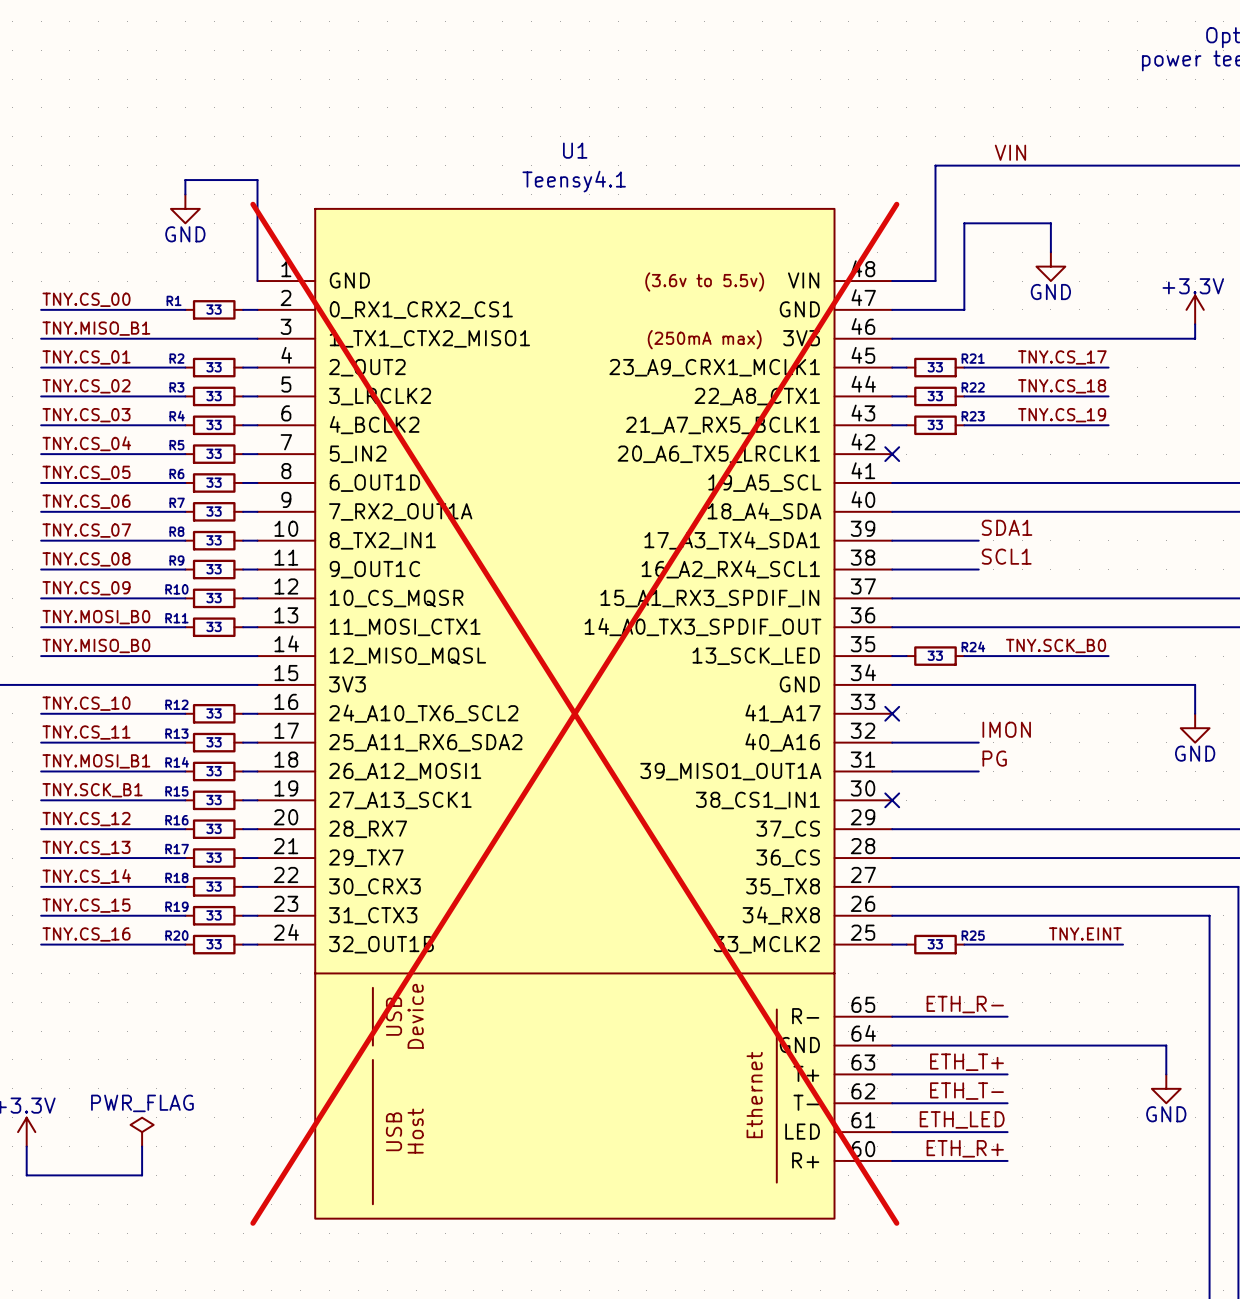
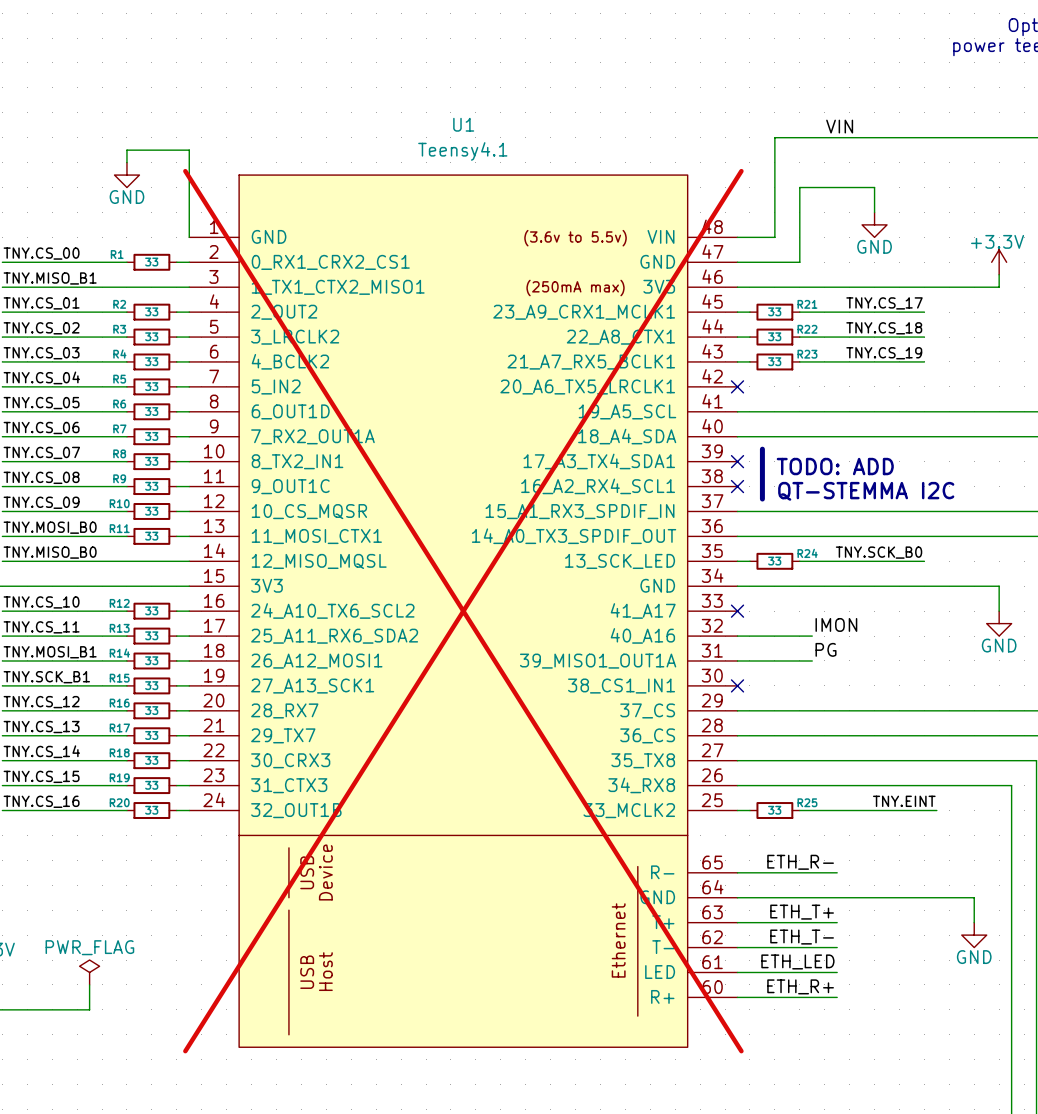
line: none -> (762, 449) (762, 499)
label: SDA1 (1007, 527) -> none
wire: (892, 540) (978, 540) -> none
no-connect mark: none -> (737, 461)
text: none -> TODO: ADD (835, 466)
label: SCL1 (1006, 556) -> none
wire: (892, 569) (978, 569) -> none
no-connect mark: none -> (737, 486)
text: none -> QT-STEMMA I2C (866, 491)

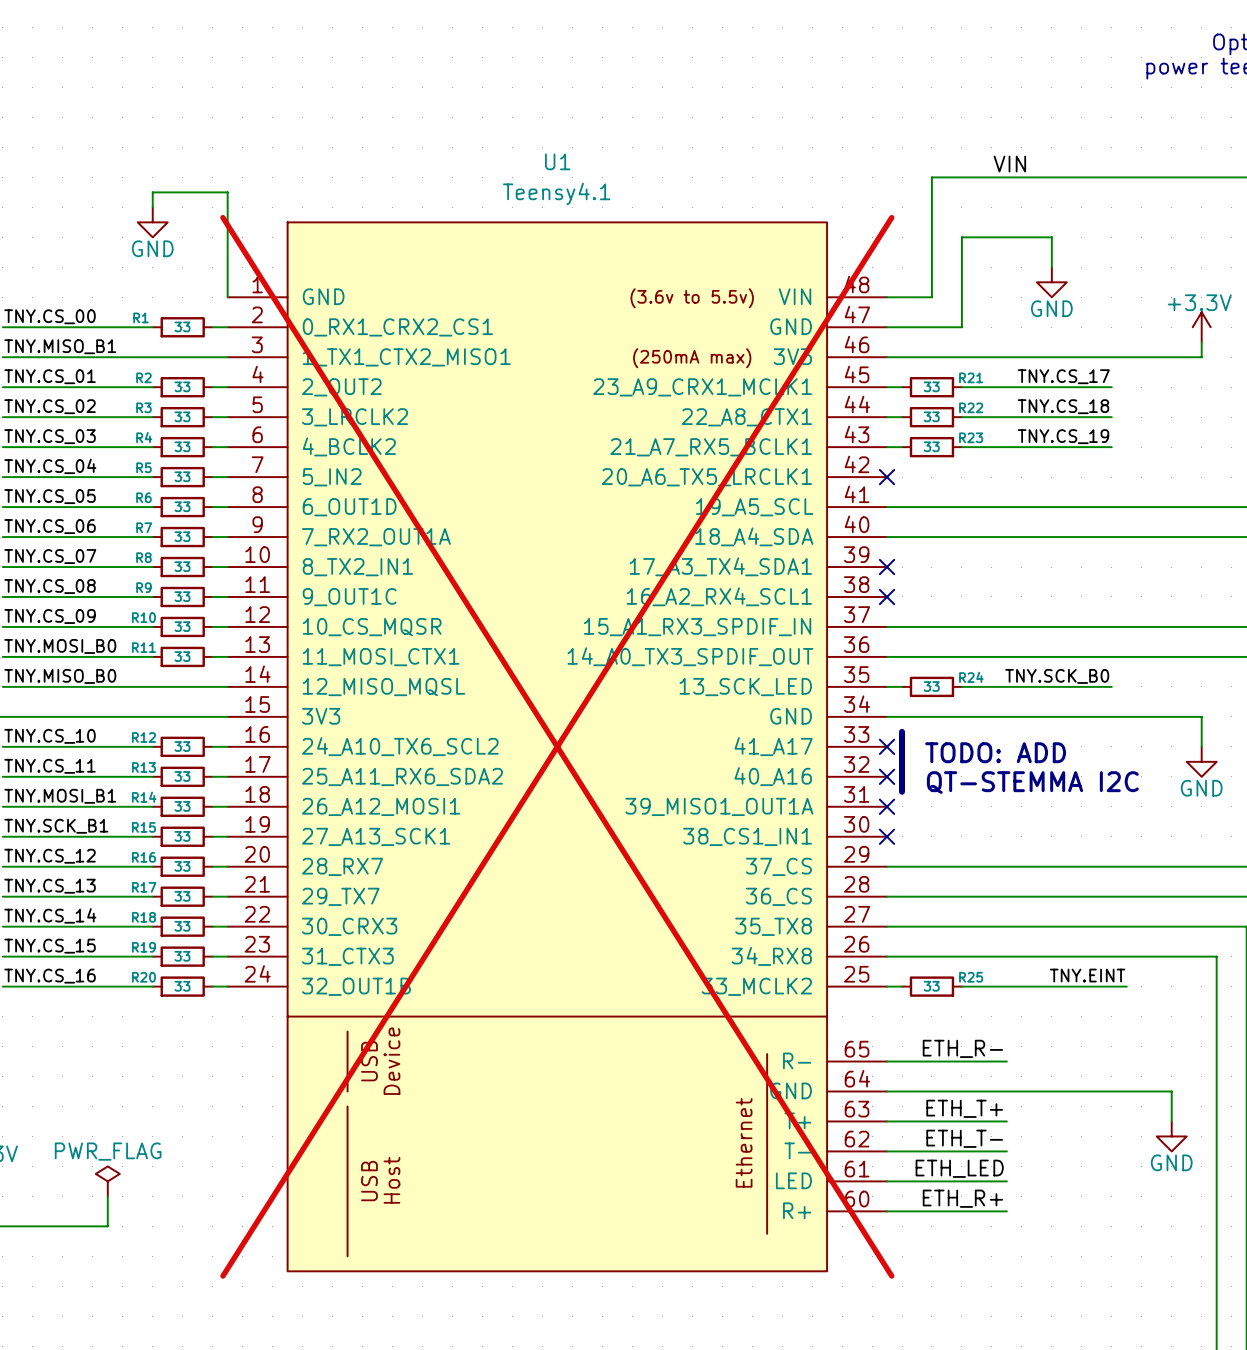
line: (762, 449) (762, 499) -> (902, 731) (902, 791)
text position: TODO: ADD (835, 466) -> TODO: ADD (995, 752)
text position: QT-STEMMA I2C (866, 491) -> QT-STEMMA I2C (1032, 782)
label: IMON (836, 624) -> none
wire: (737, 636) (812, 636) -> none
no-connect mark: none -> (887, 776)
label: PG (826, 649) -> none
wire: (737, 660) (812, 660) -> none
no-connect mark: none -> (887, 806)

